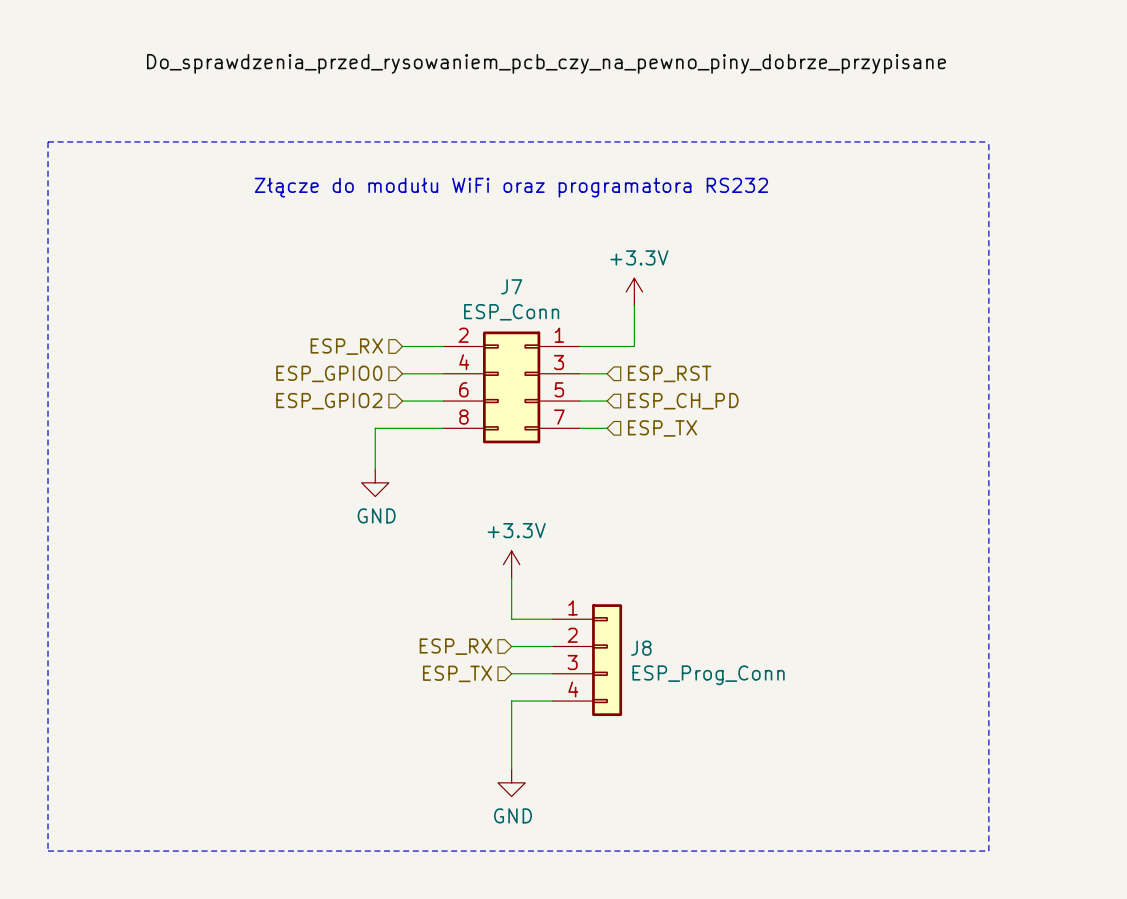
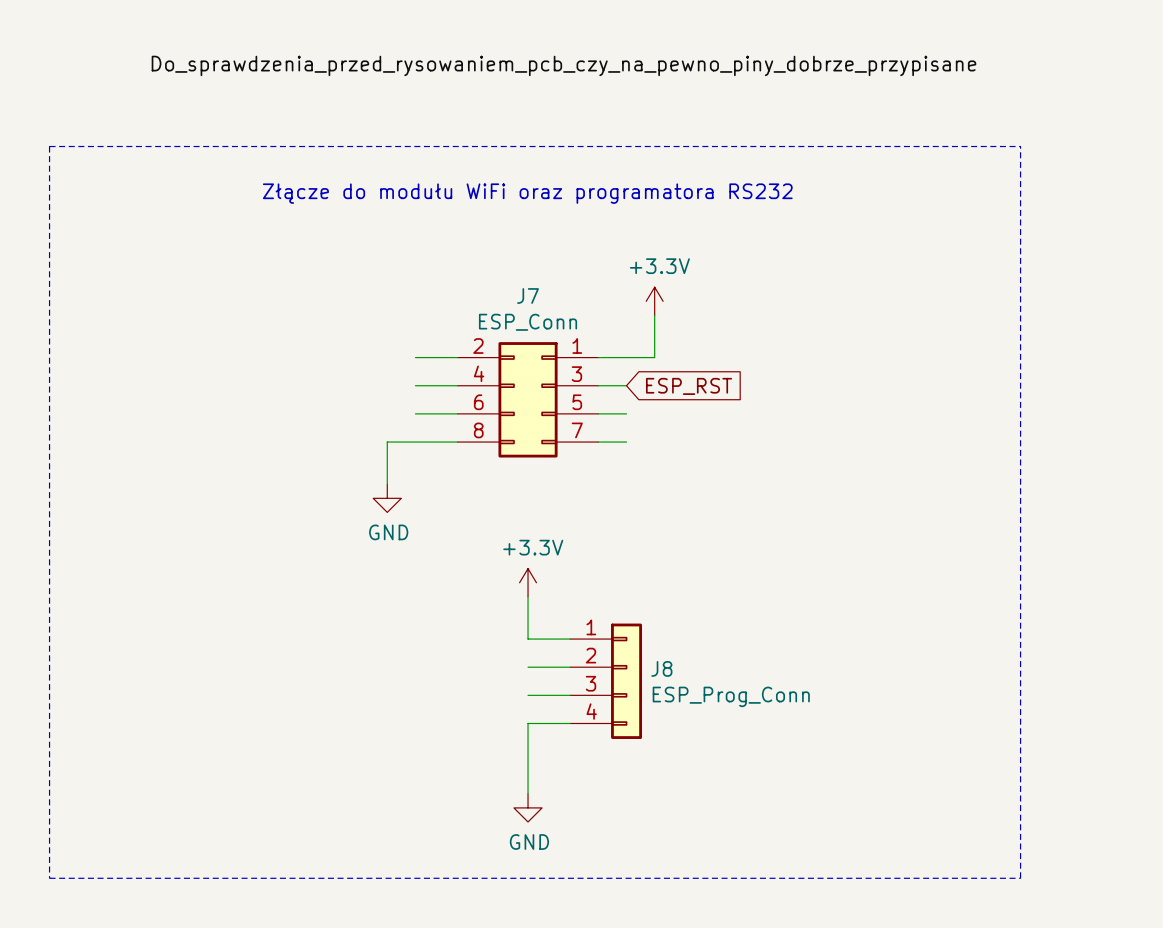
hierarchical label: ESP_RX (346, 346) -> none
hierarchical label: ESP_GPIO0 (329, 373) -> none
hierarchical label: ESP_RST (669, 373) -> none
global label: none -> ESP_RST (689, 386)
hierarchical label: ESP_GPIO2 (329, 401) -> none
hierarchical label: ESP_CH_PD (683, 401) -> none
hierarchical label: ESP_TX (662, 428) -> none
hierarchical label: ESP_RX (455, 646) -> none
hierarchical label: ESP_TX (457, 673) -> none

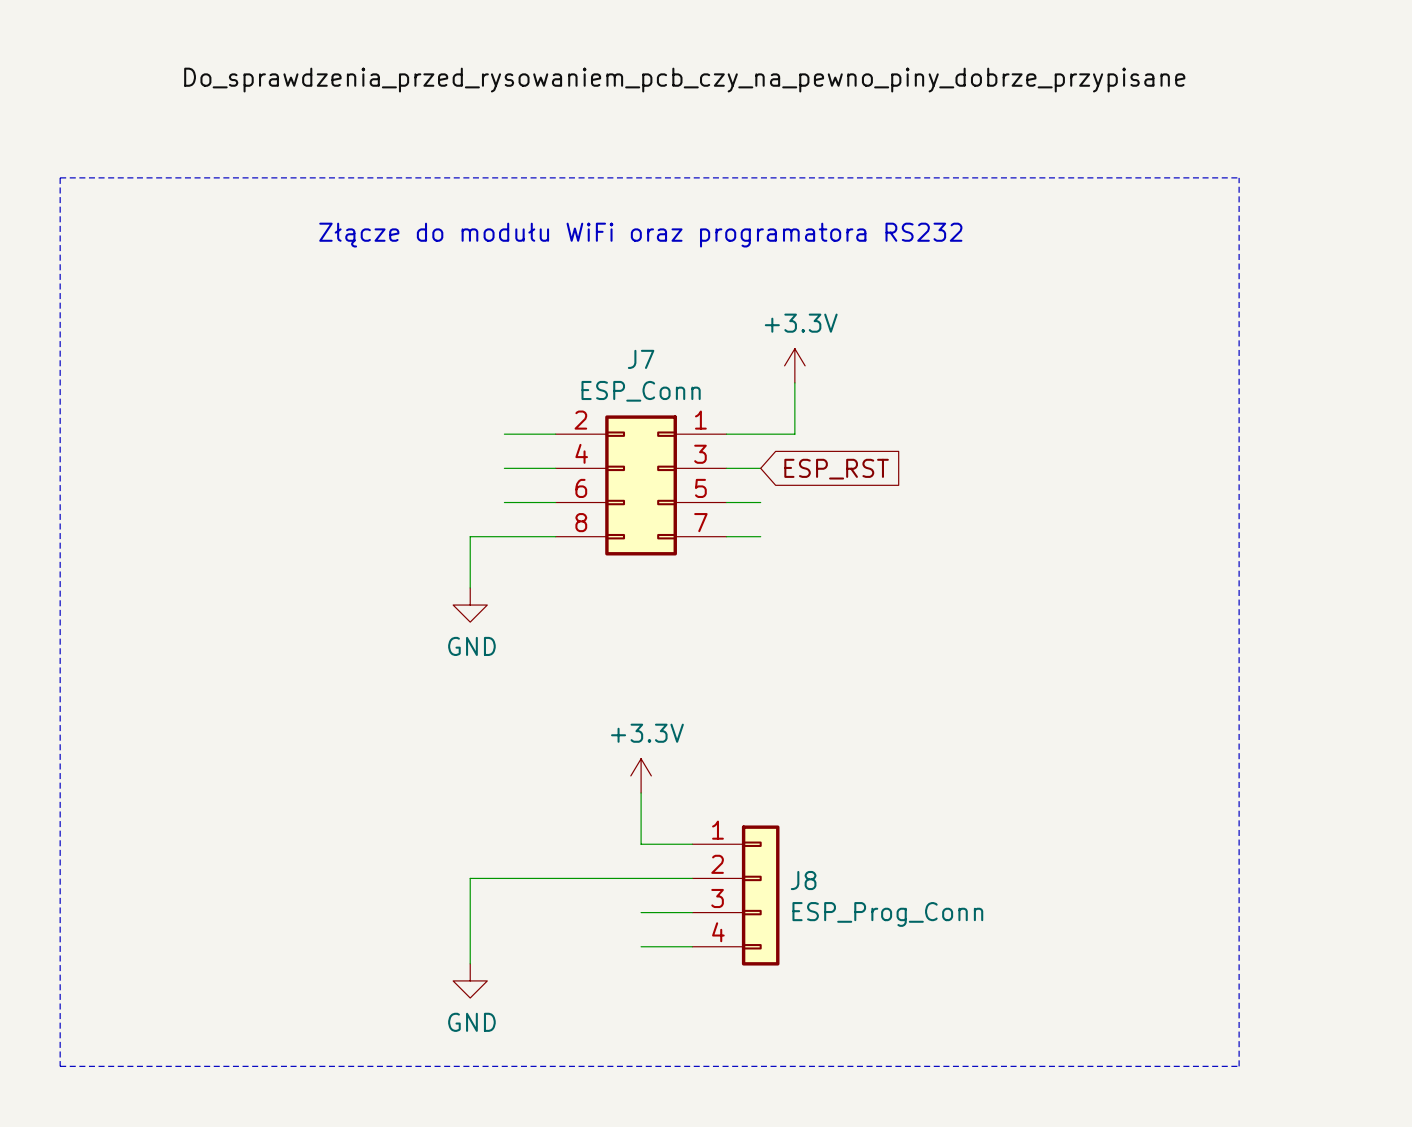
power symbol position: +3.3V (528, 582) -> +3.3V (641, 775)
wire: (528, 596) (528, 639) (570, 639) -> none
wire: none -> (641, 792) (641, 844)
wire: (528, 667) (570, 667) -> (641, 912) (692, 912)
J8 position: (606, 681) -> (735, 895)
wire: (528, 723) (528, 793) -> (641, 878) (470, 878) (470, 963)
wire: none -> (641, 946) (692, 946)
power symbol position: GND (528, 807) -> GND (470, 980)

